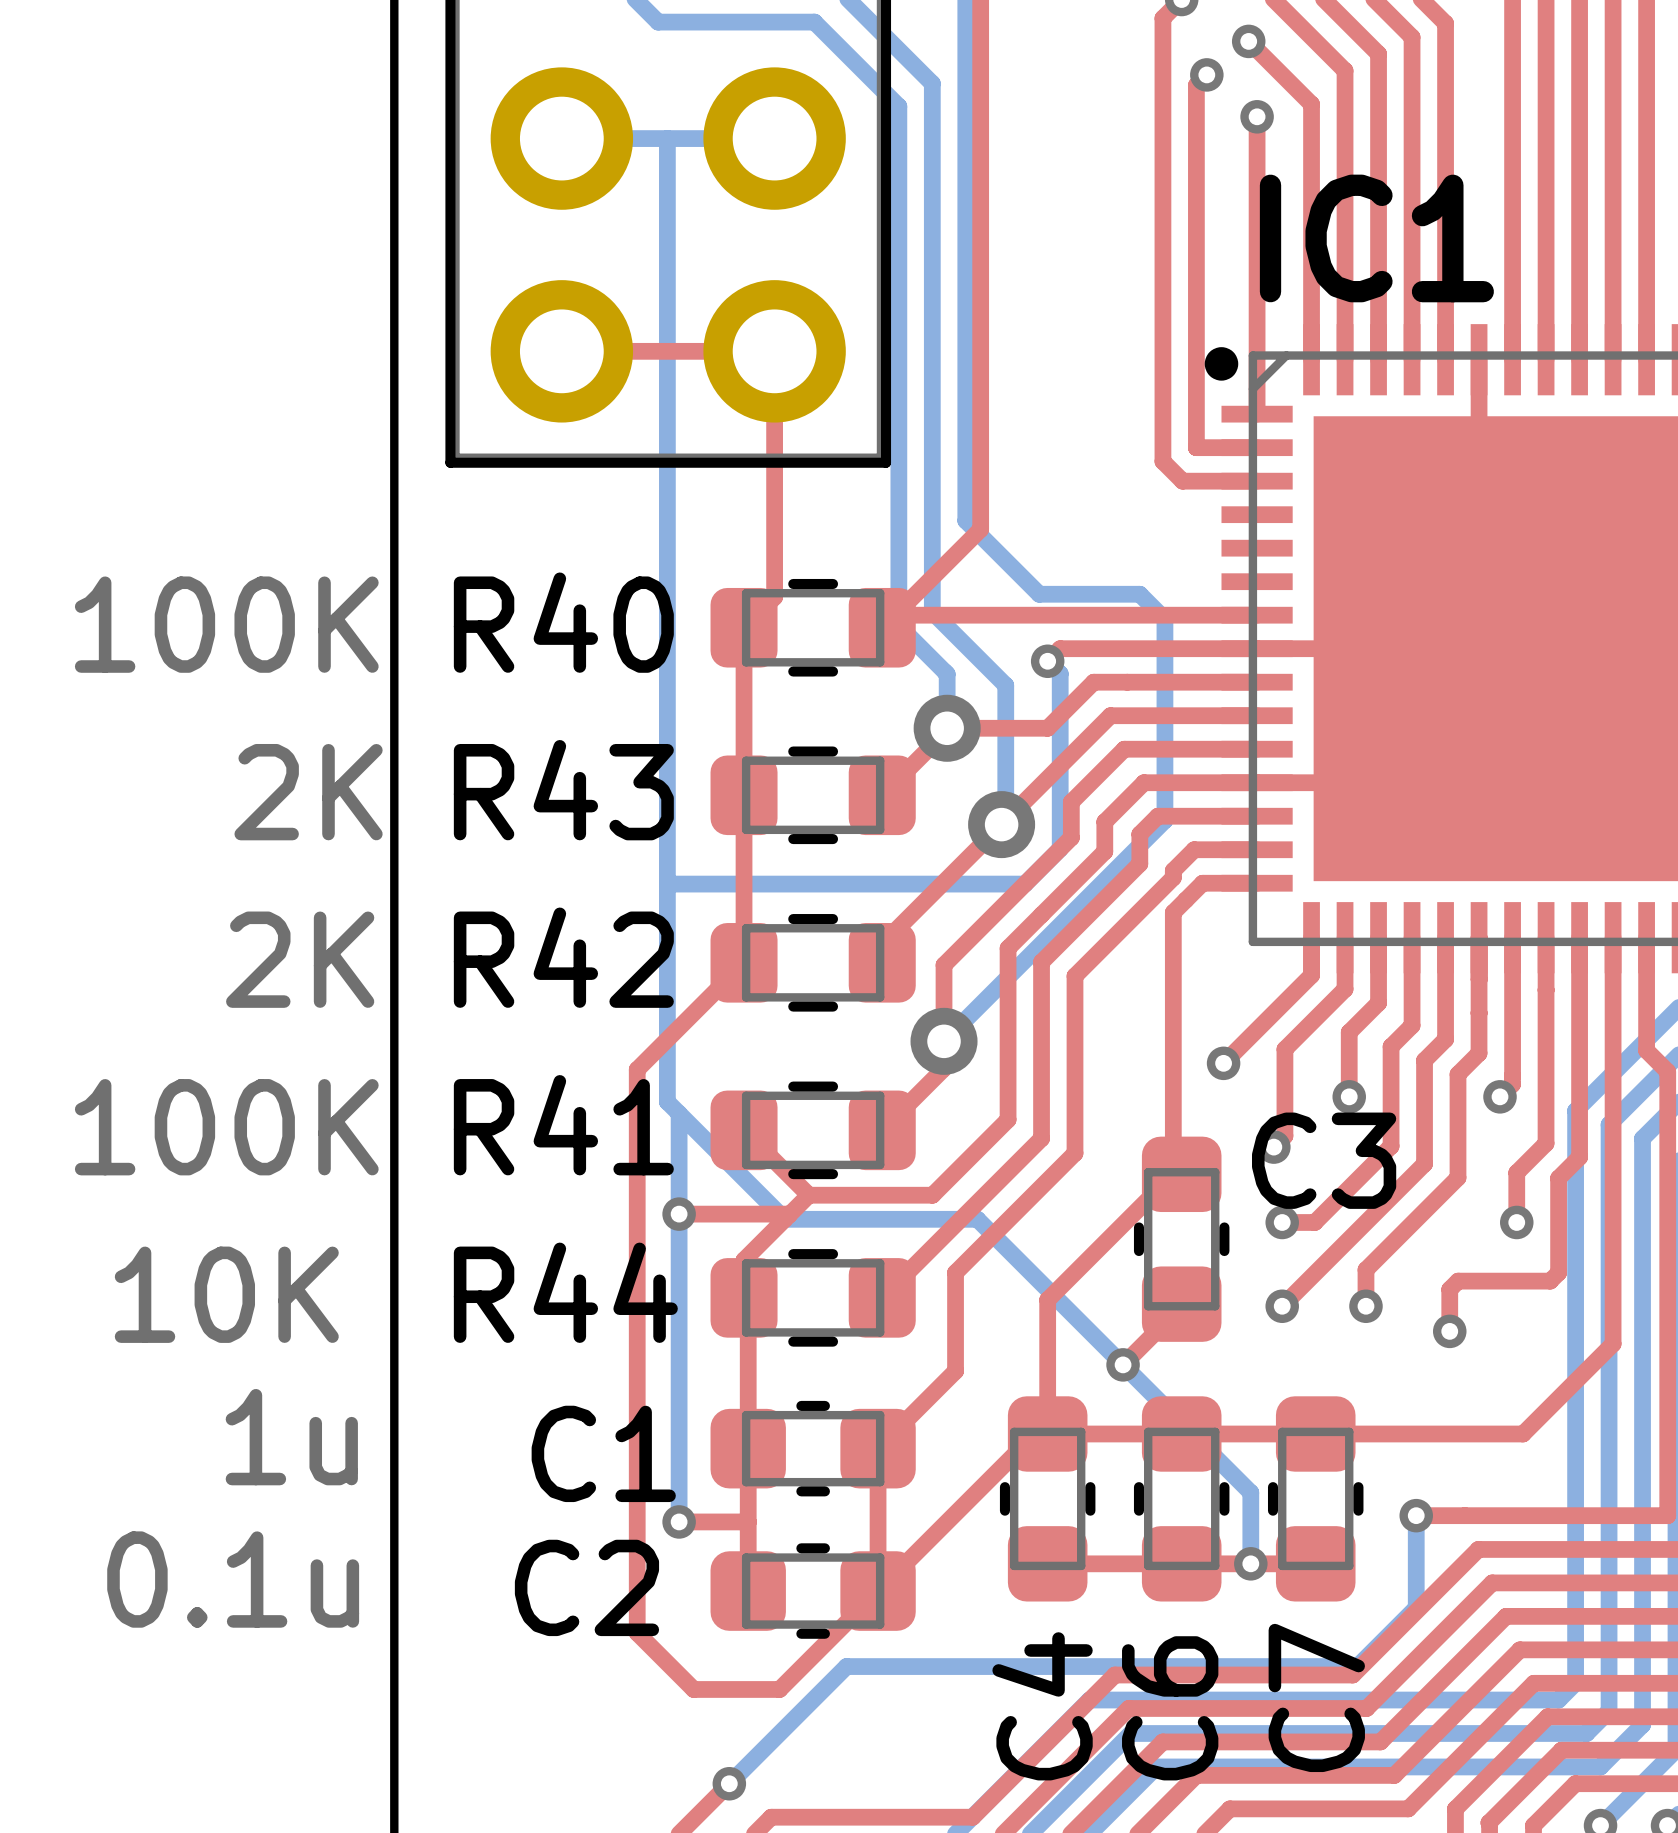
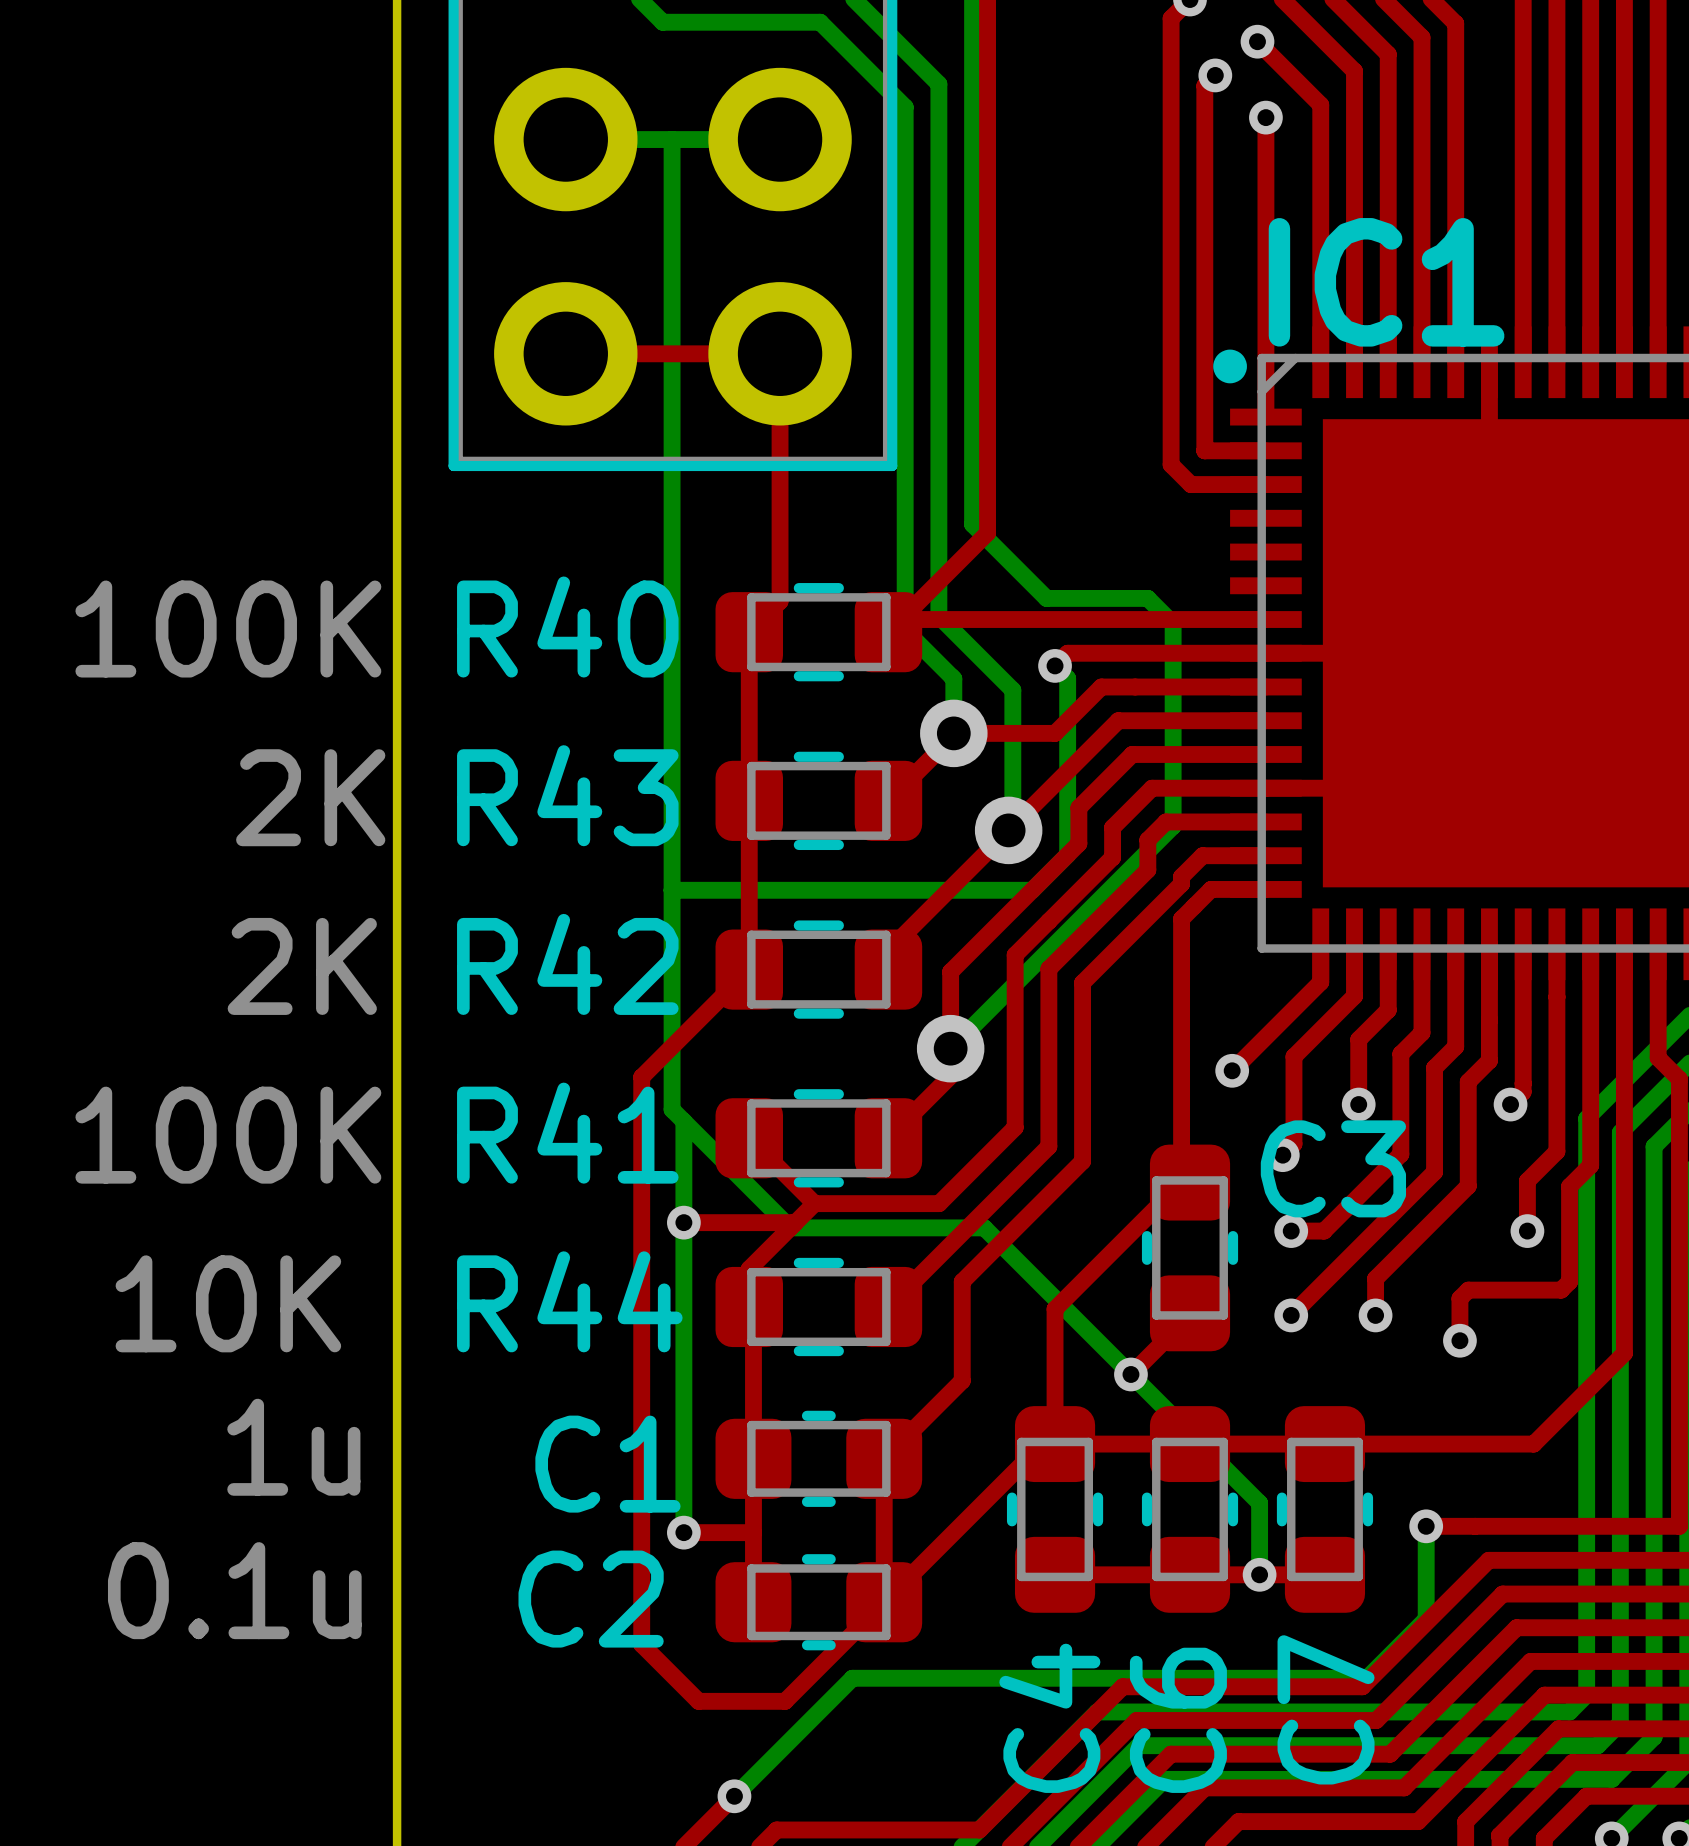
IC1 name position: IC1 (1376, 238) -> IC1 (1386, 282)

